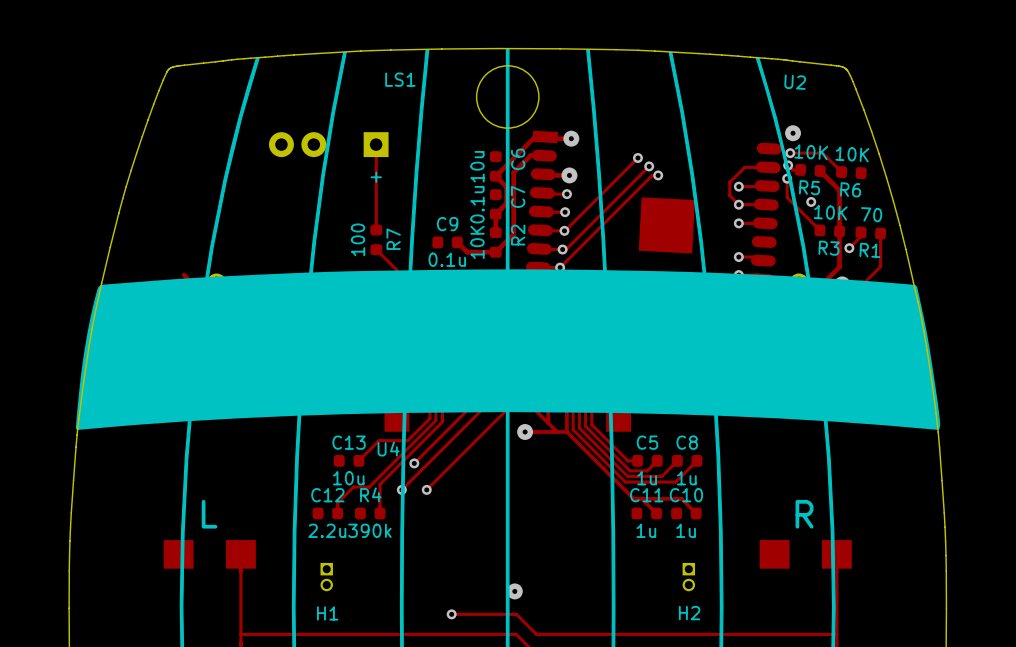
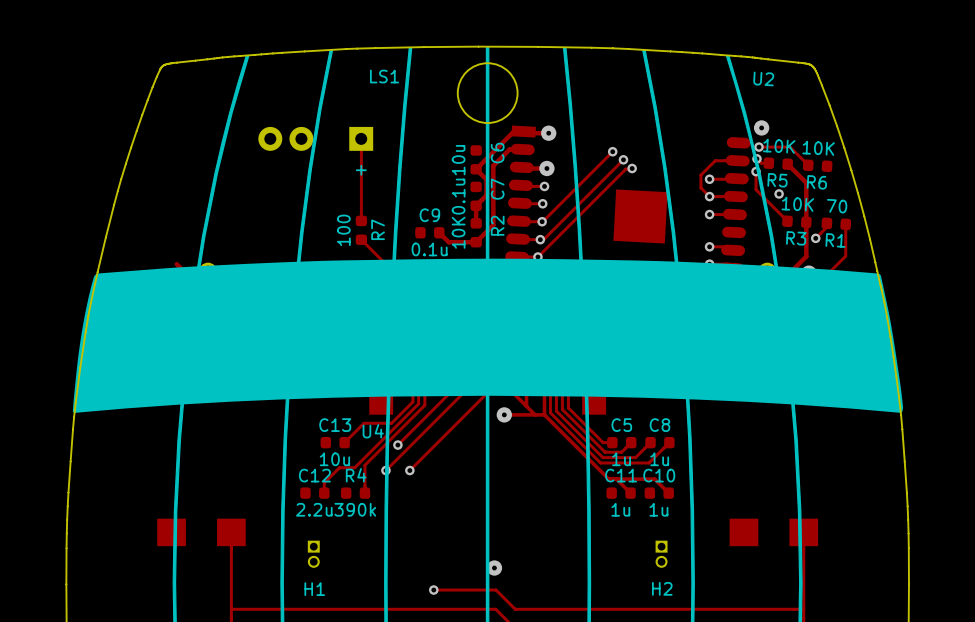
text: L (209, 514) -> none
text: R (804, 514) -> none

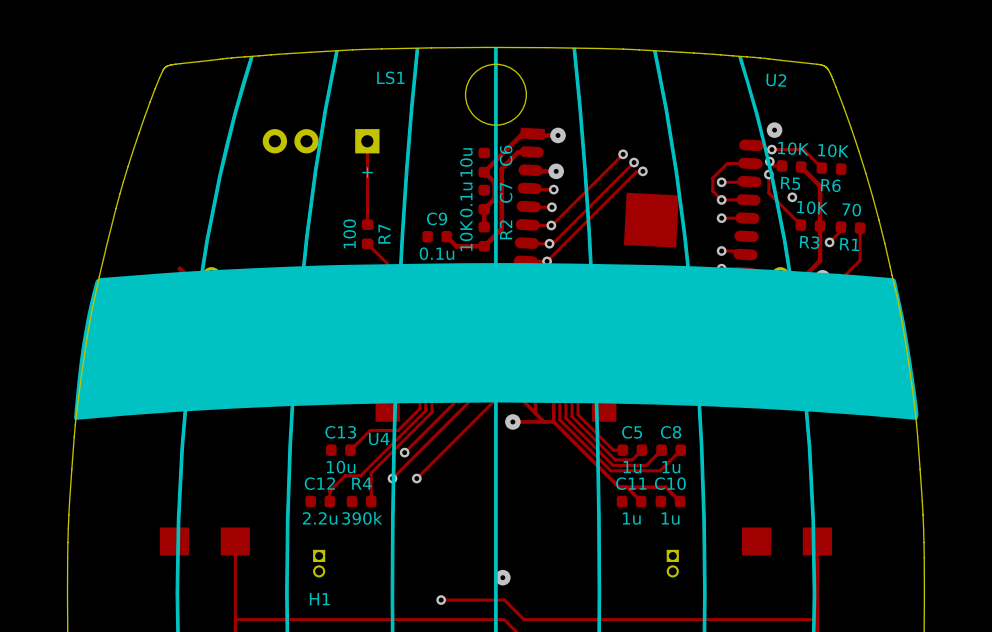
H2: (662, 588) -> none

